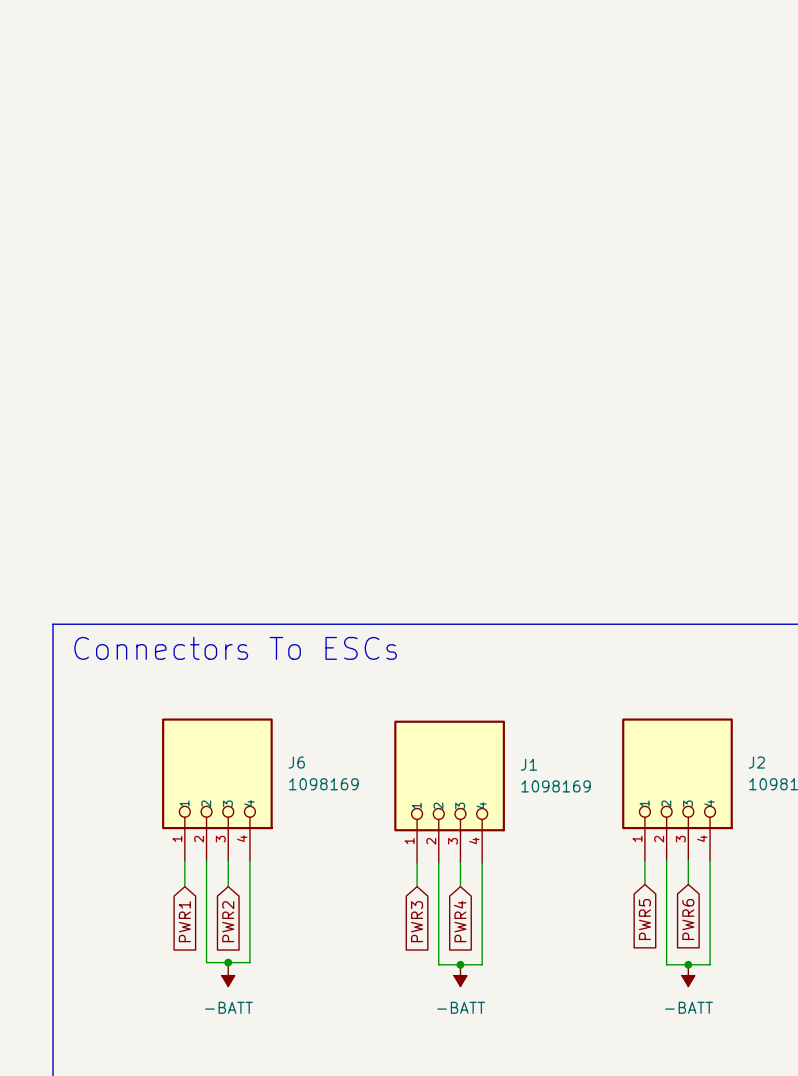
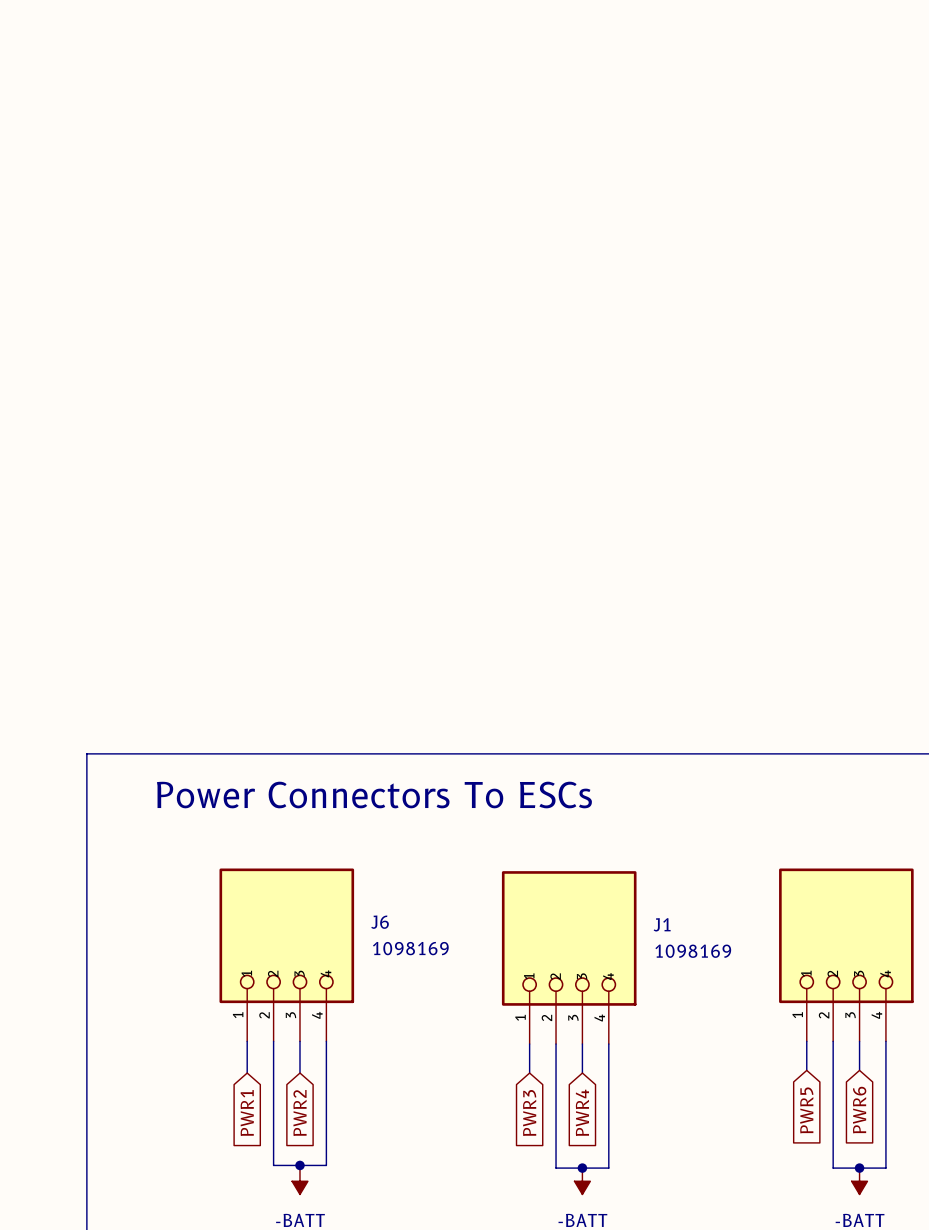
text: Connectors To ESCs (235, 648) -> Power Connectors To ESCs (374, 795)

